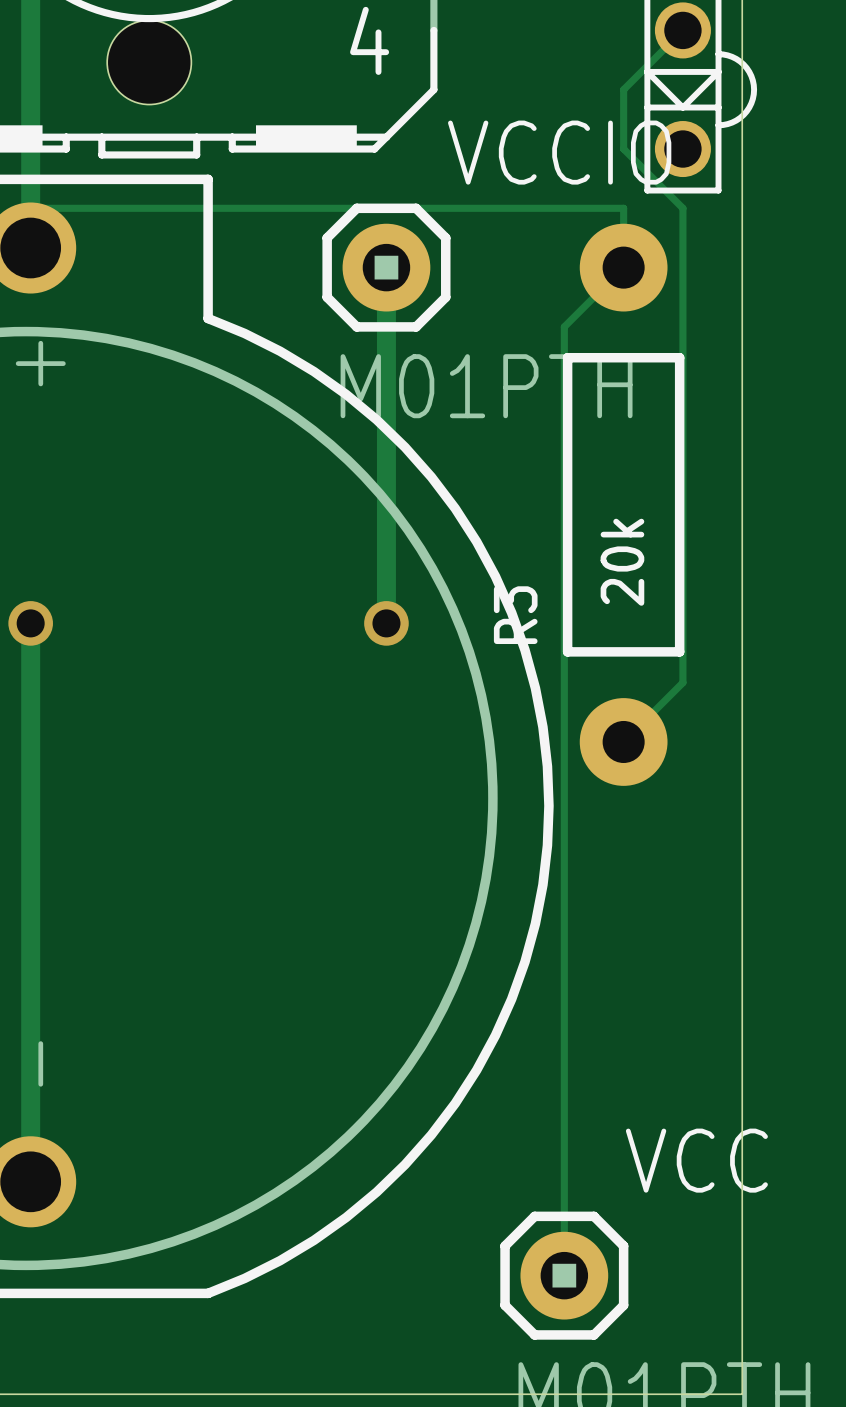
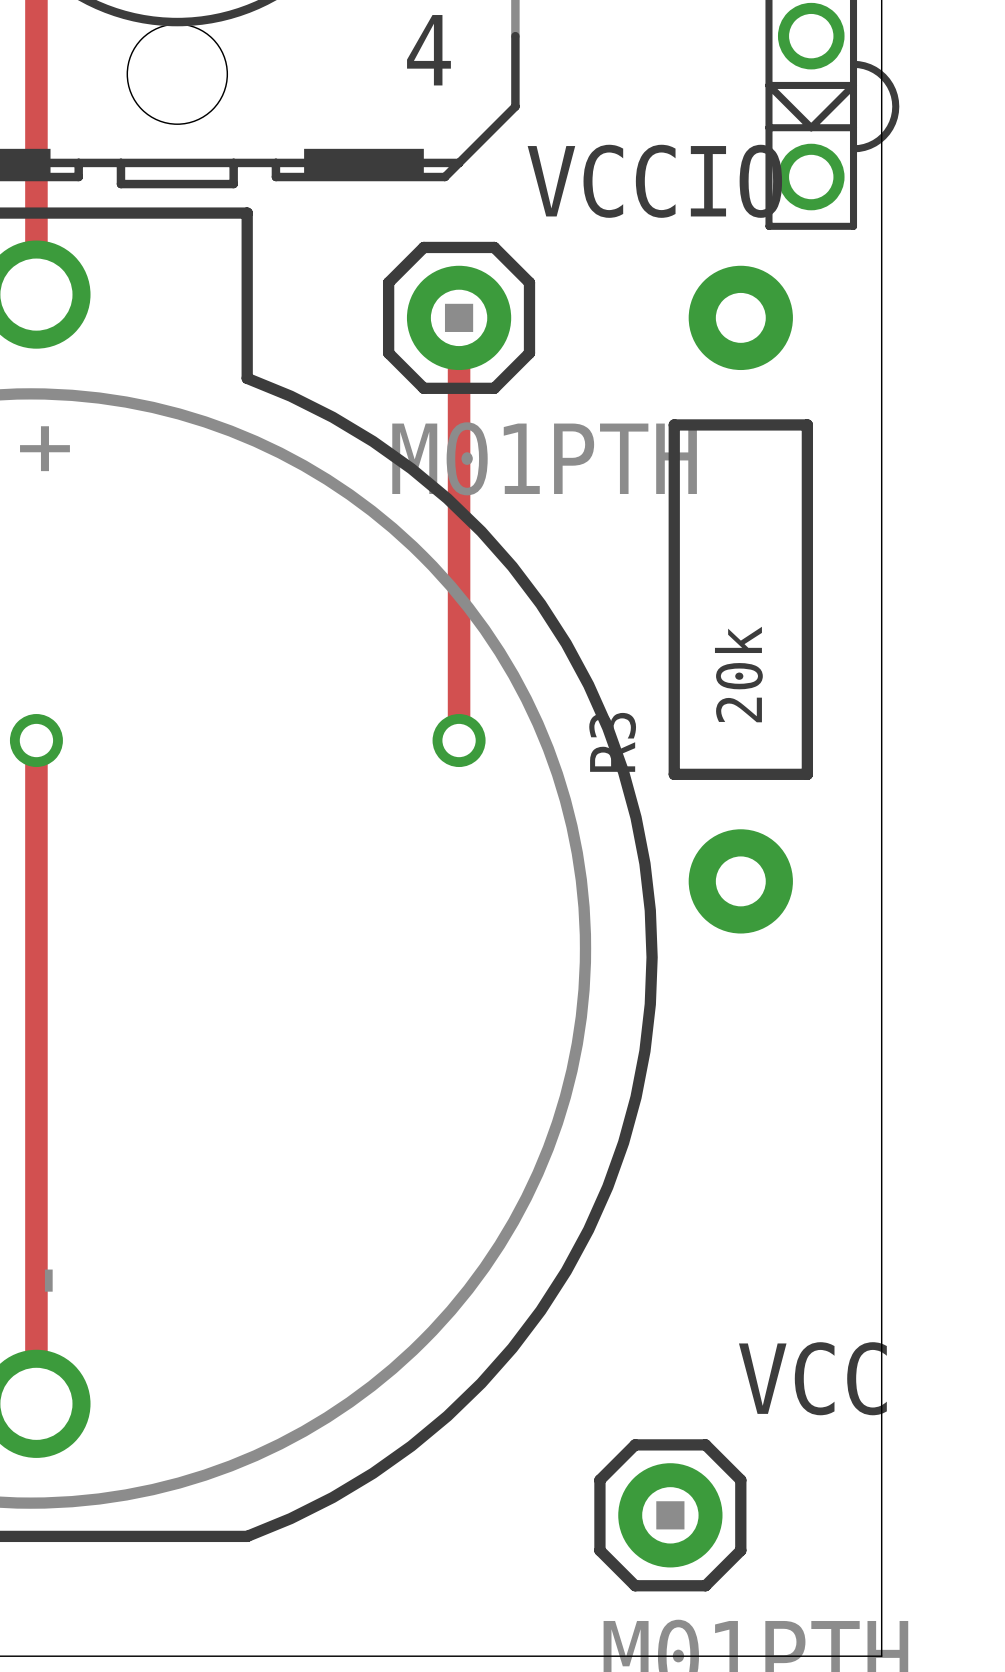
track: (682, 30) (623, 89) (623, 149) (682, 208) (682, 682) (623, 741) -> none
track: (30, 208) (623, 208) (623, 267) (564, 326) (564, 1275) -> none

